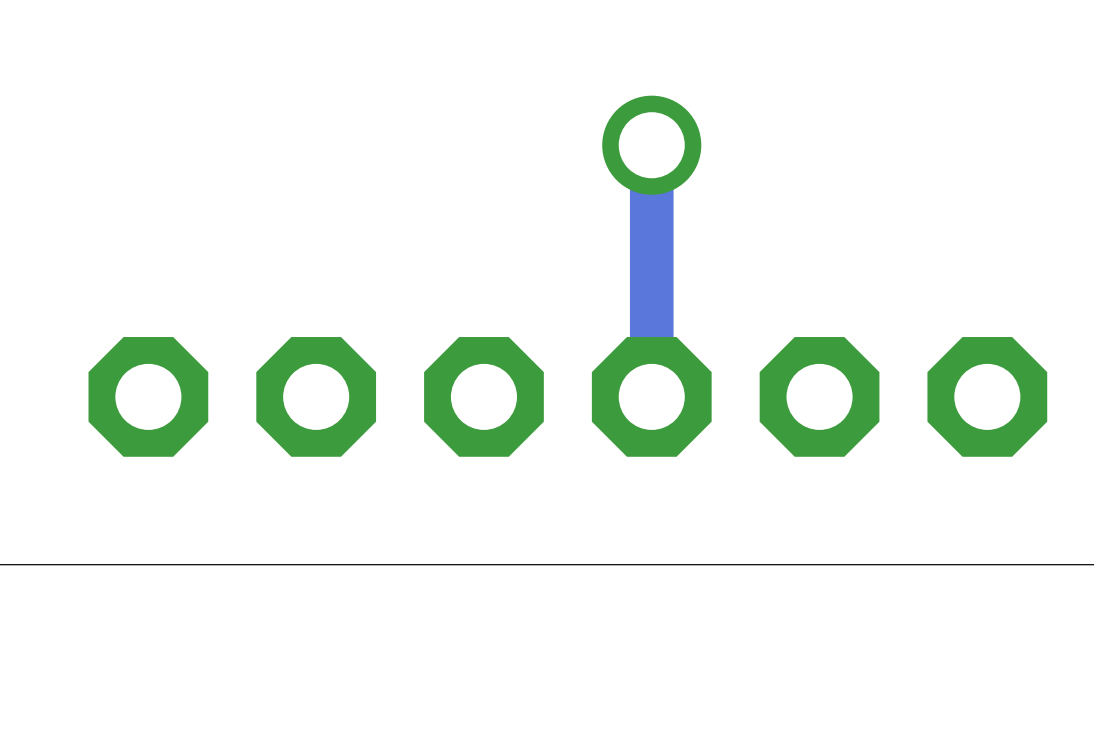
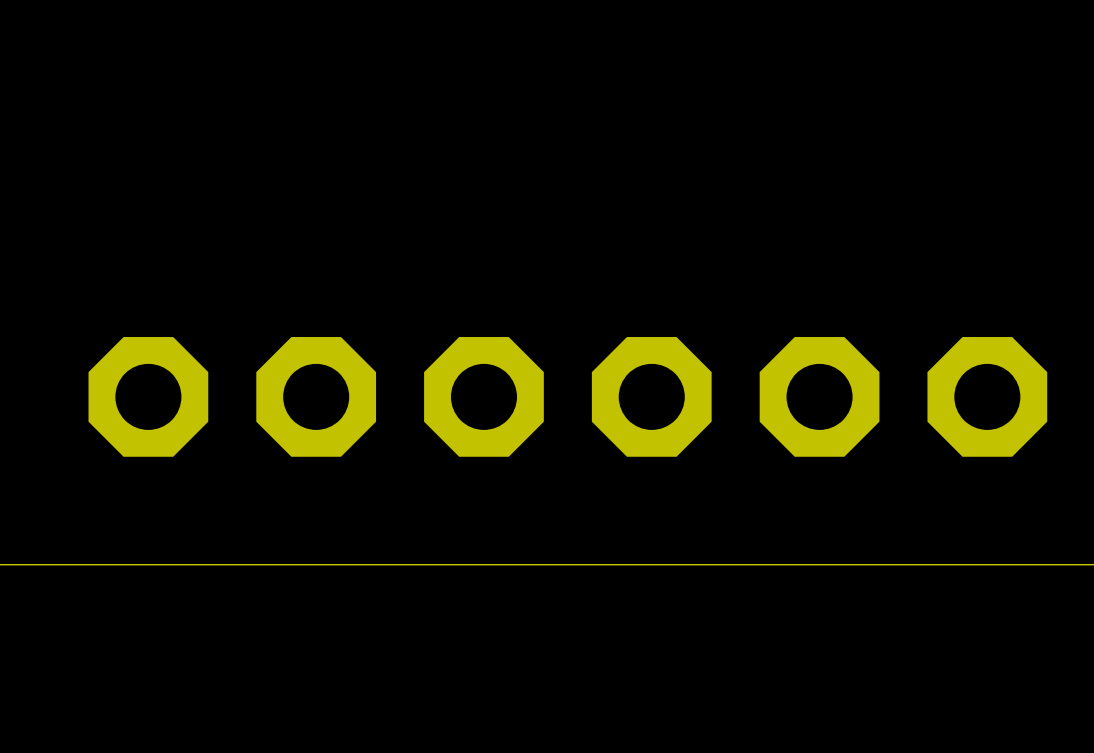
track: (651, 145) (651, 396) -> none
via: (651, 145) -> none

